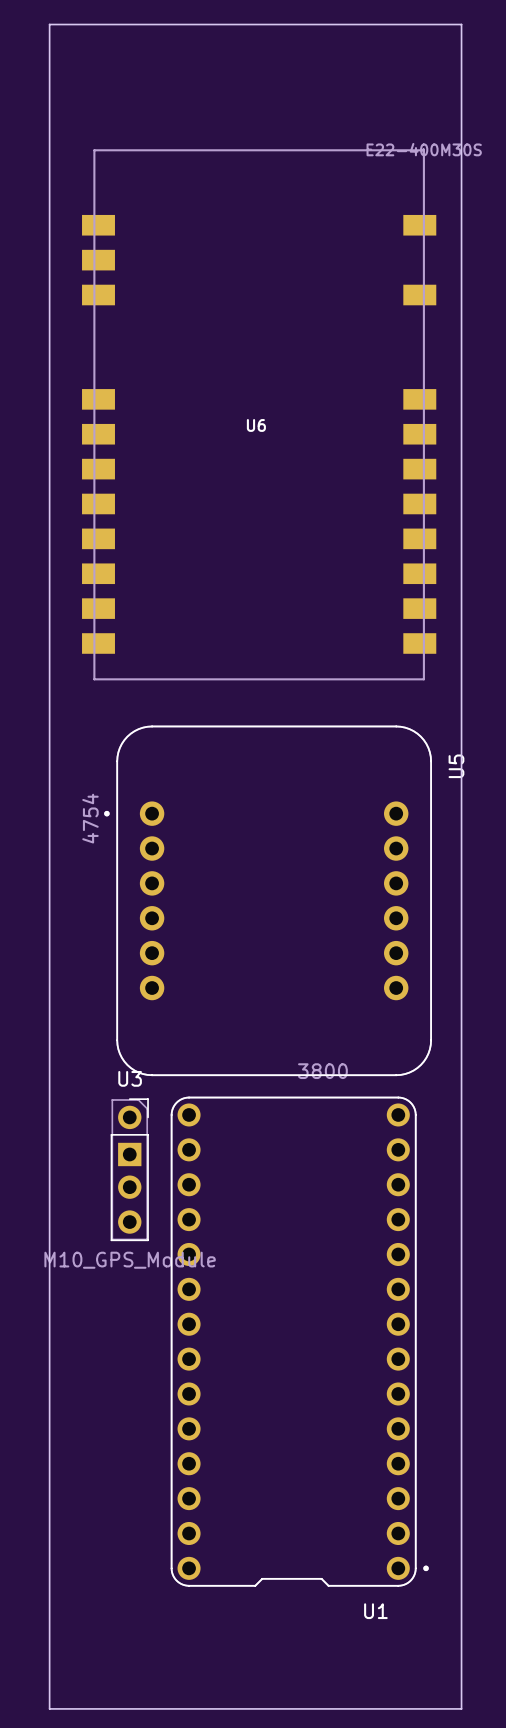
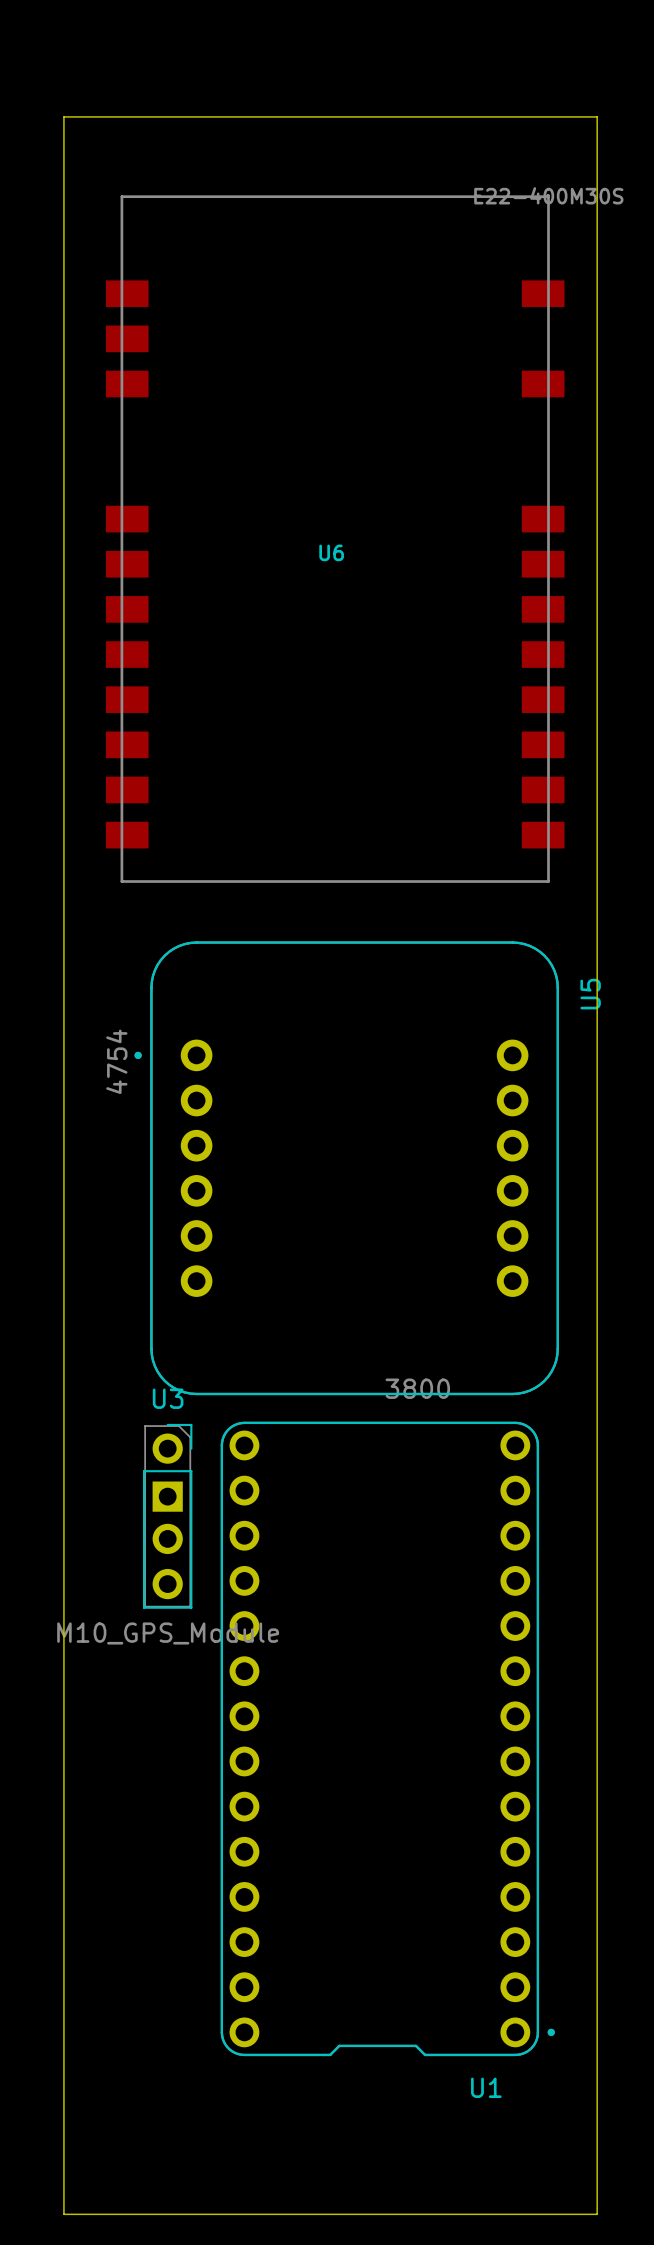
board edge: (49, 88) (49, 24) (461, 24) (461, 88) -> (63, 116) (597, 116)

